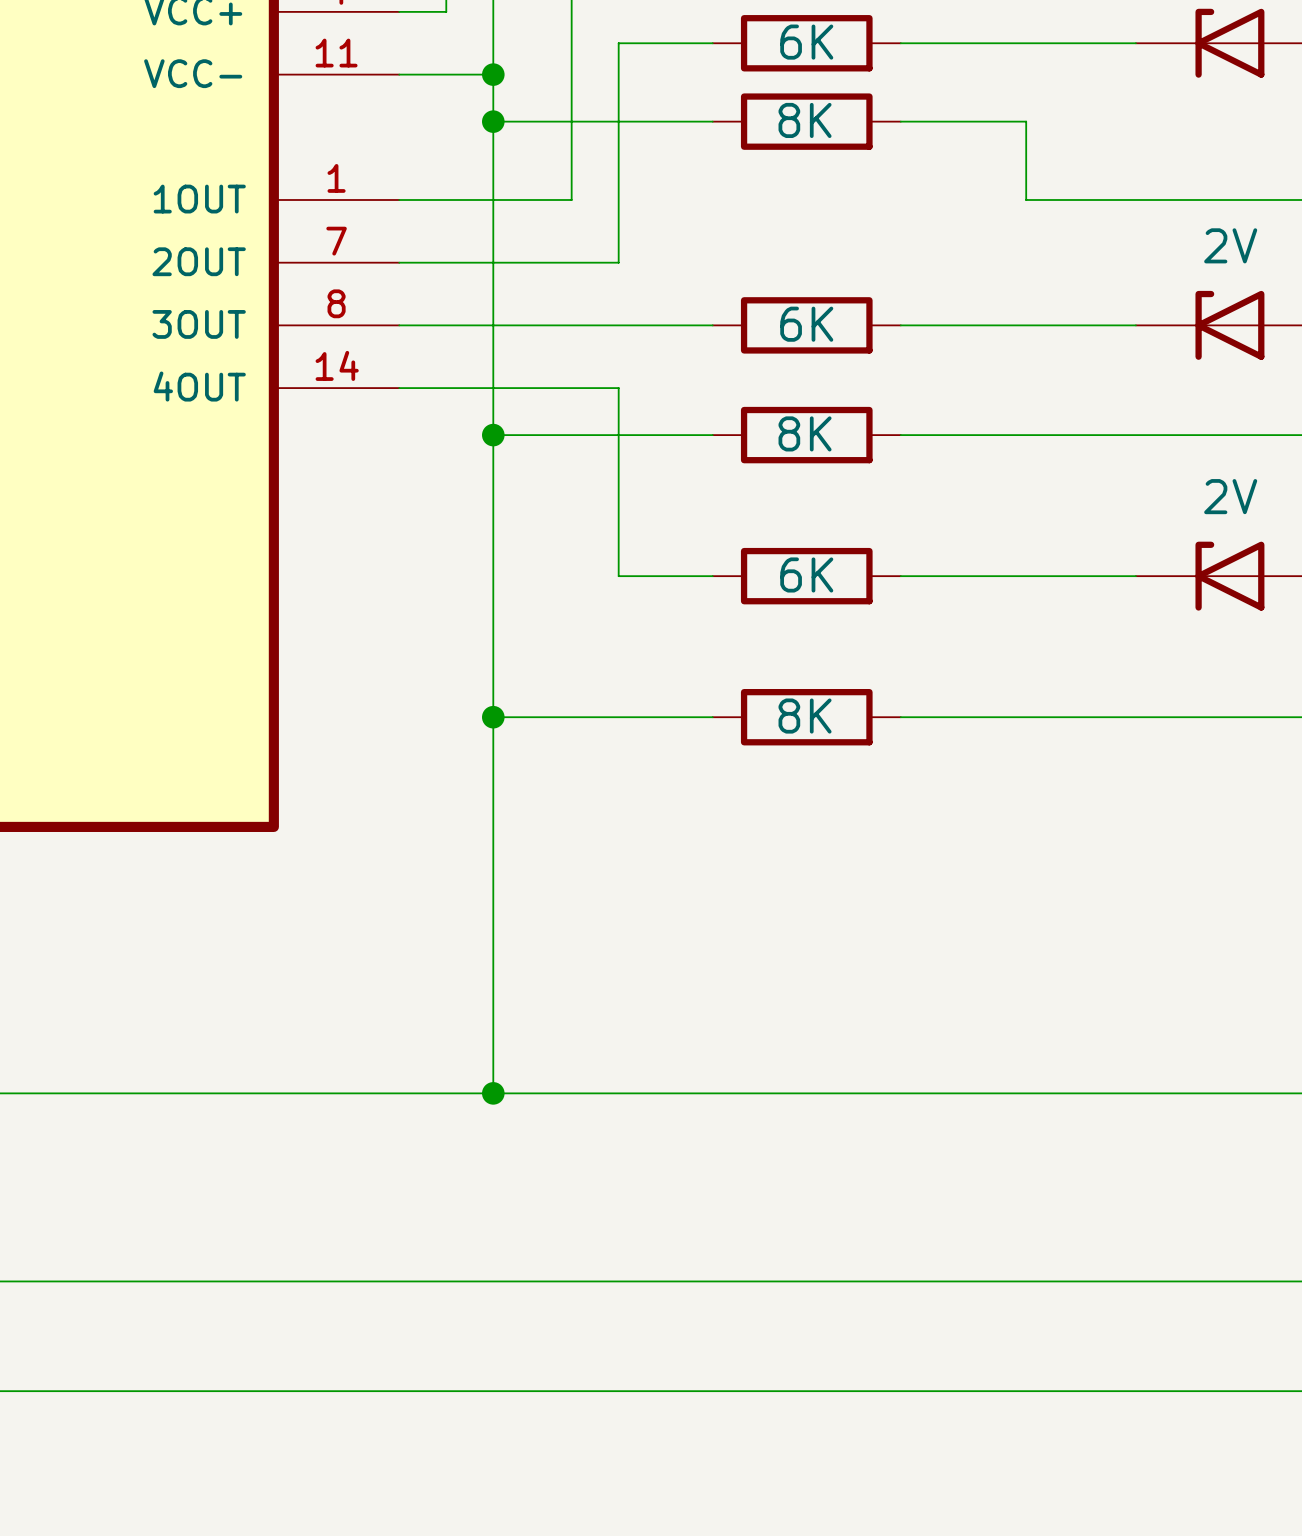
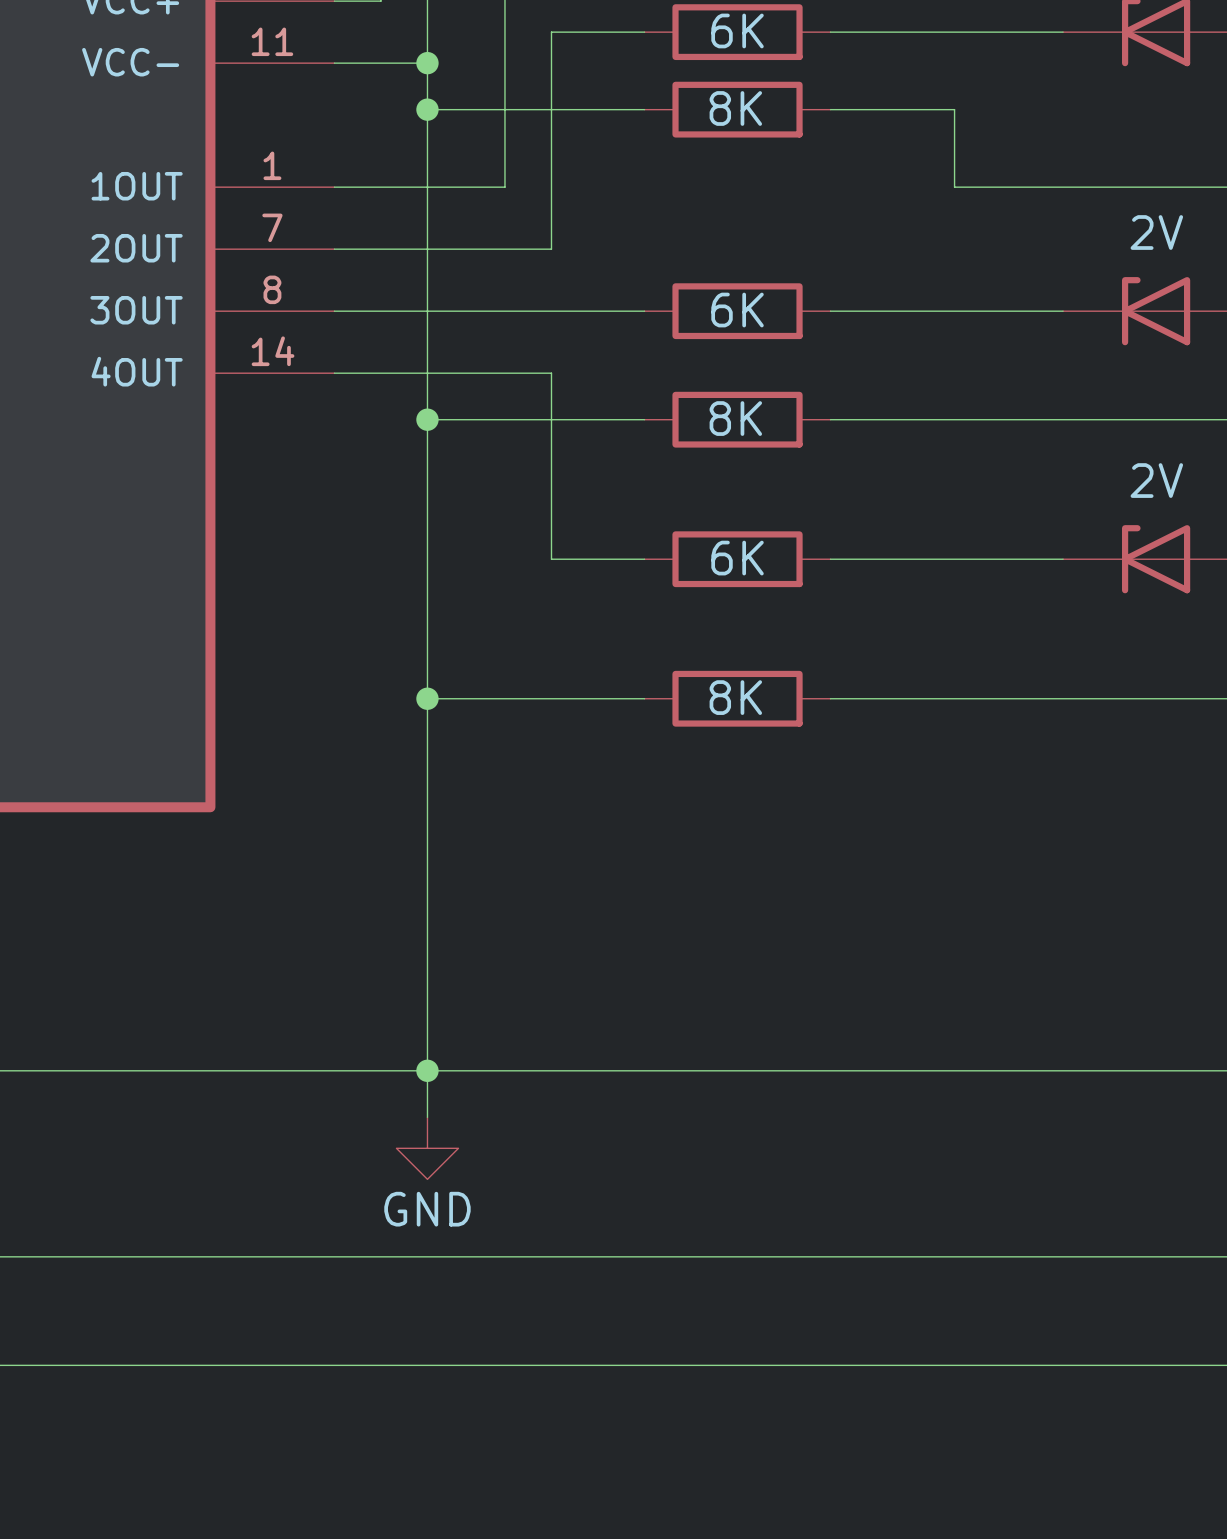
wire: none -> (427, 1073) (427, 1117)
power symbol: none -> GND (427, 1148)

